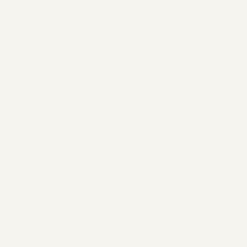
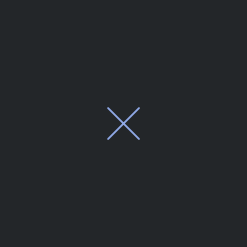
no-connect mark: none -> (123, 123)

